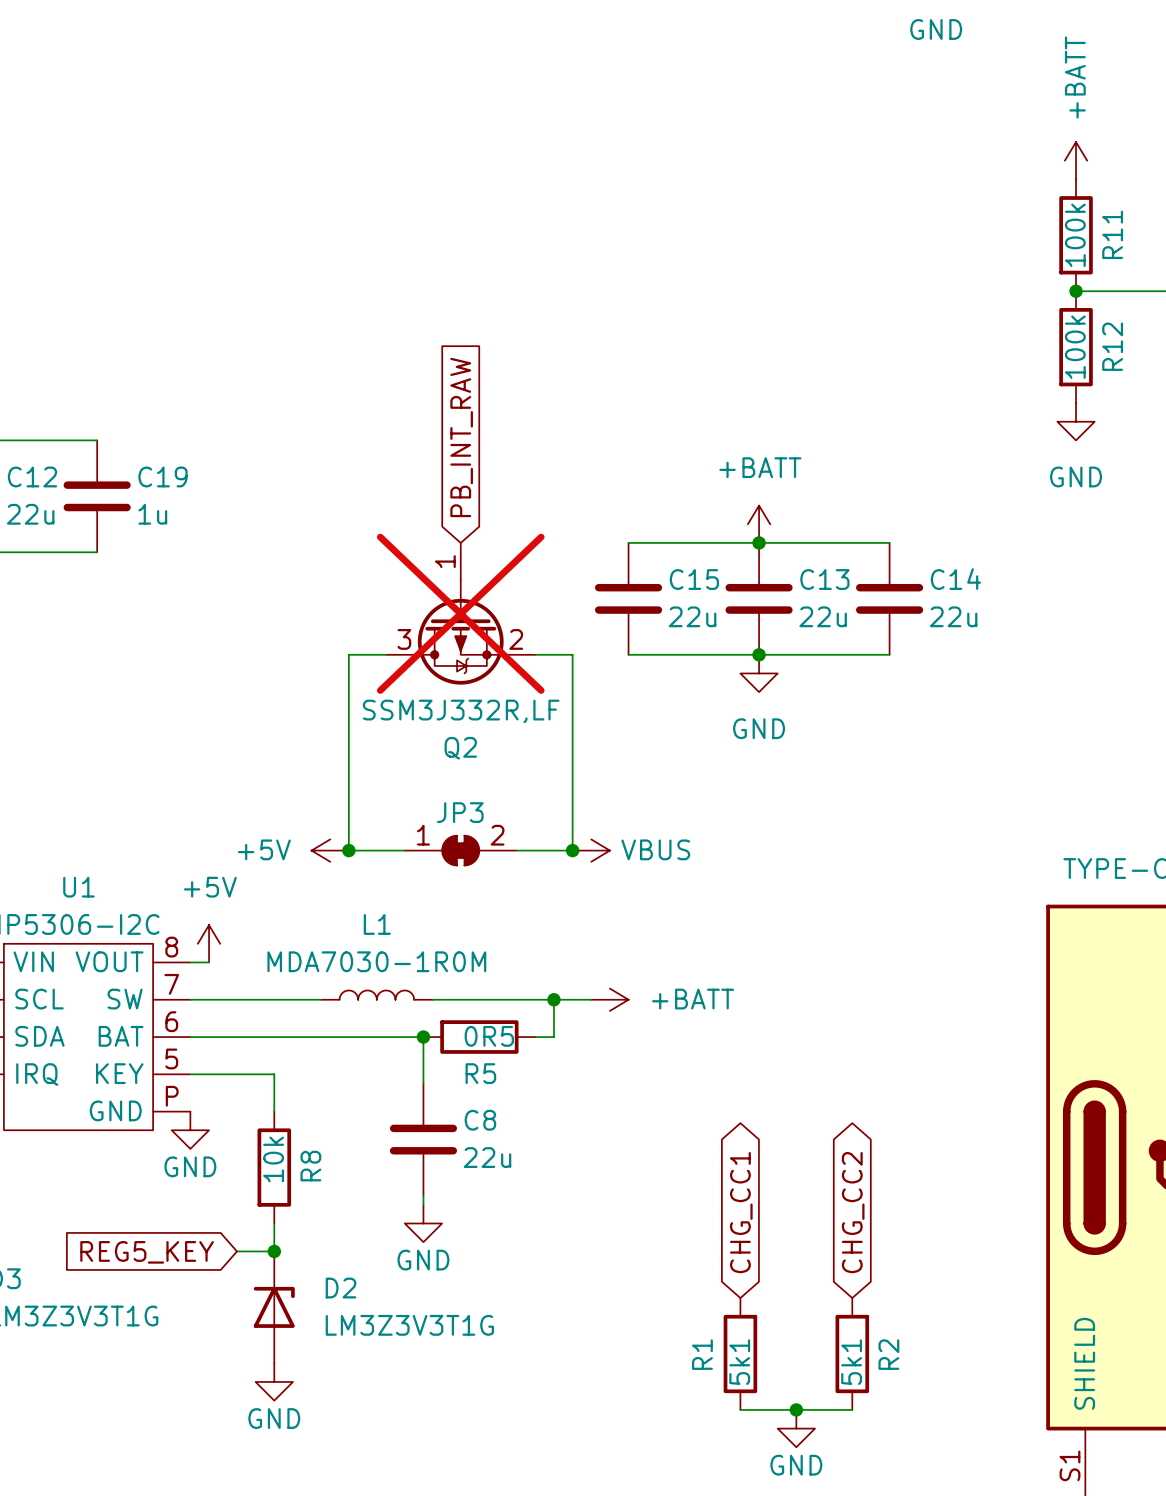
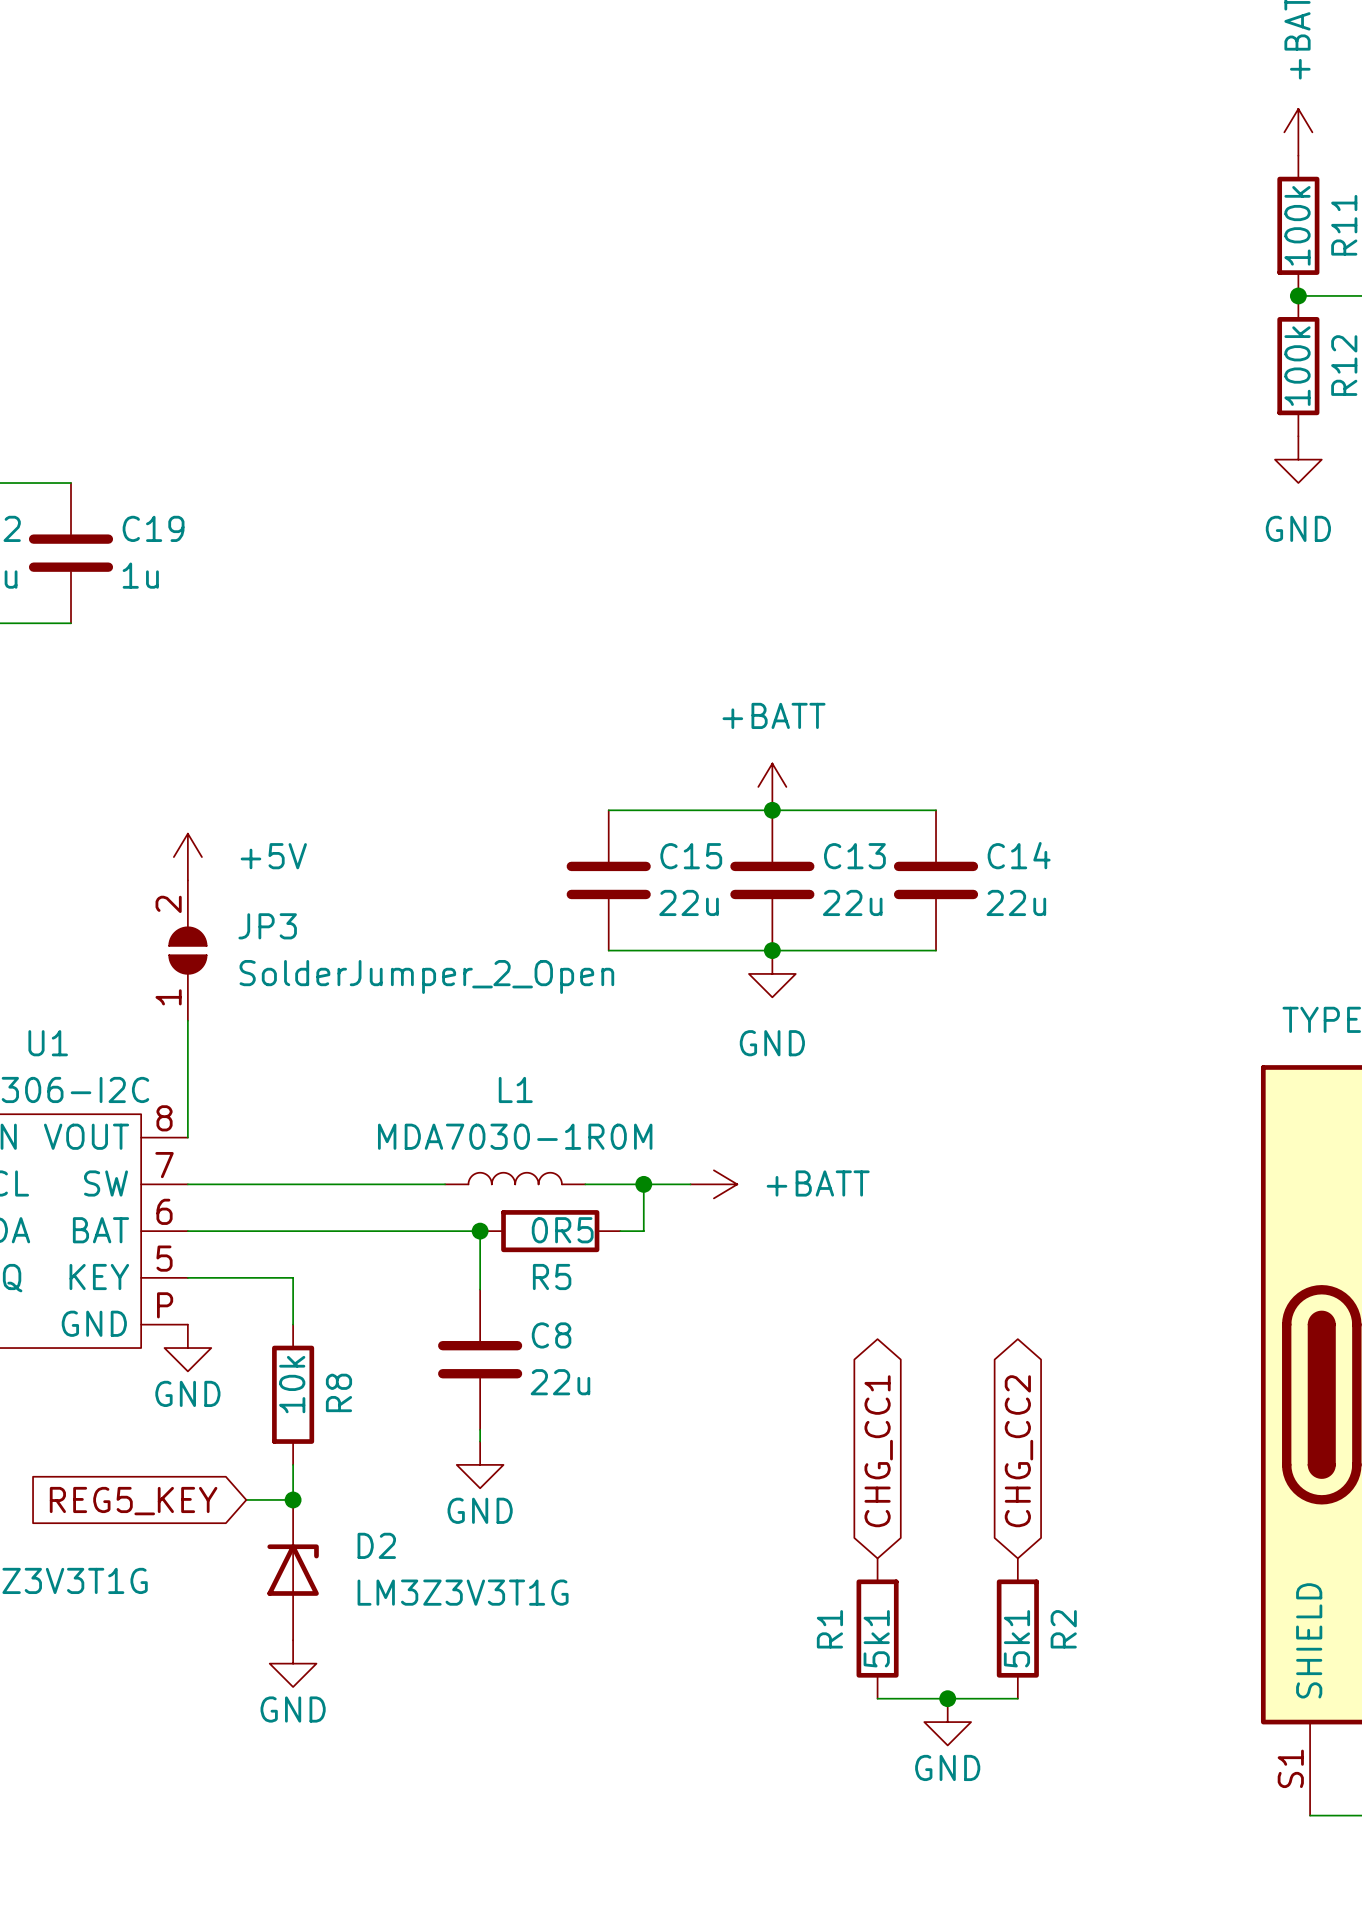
global label: PB_INT_RAW (461, 437) -> none
power symbol position: +BATT (759, 524) -> +BATT (772, 786)
wire: (628, 542) (889, 542) -> (608, 810) (936, 810)
junction: (759, 542) -> none
C15 position: (628, 598) -> (608, 880)
C13 position: (759, 598) -> (772, 880)
C14 position: (889, 598) -> (936, 880)
Q2: SSM3J332R,LF (460, 613) -> none
wire: (386, 654) (348, 654) (348, 850) (404, 850) -> none
wire: (535, 654) (572, 654) (572, 850) (516, 850) -> none
wire: (628, 654) (889, 654) -> (608, 950) (936, 950)
junction: (759, 654) -> none
power symbol position: GND (759, 673) -> GND (772, 973)
junction: none -> (772, 810)
power symbol: none -> +5V (187, 857)
JP3 name position: JP3 (460, 812) -> JP3 (267, 926)
junction: none -> (772, 950)
JP3 value: none -> SolderJumper_2_Open (426, 976)
JP3 symbol: [404, 835, 517, 866] -> [169, 880, 207, 1021]
power symbol: +5V (330, 850) -> none
junction: (348, 850) -> none
junction: (572, 850) -> none
power symbol: VBUS (591, 850) -> none
power symbol: +5V (209, 943) -> none
wire: (190, 962) (209, 962) -> (187, 1137) (187, 1020)
L1 position: (376, 995) -> (515, 1178)
wire: (432, 999) (507, 999) -> (351, 1184) (445, 1184)

